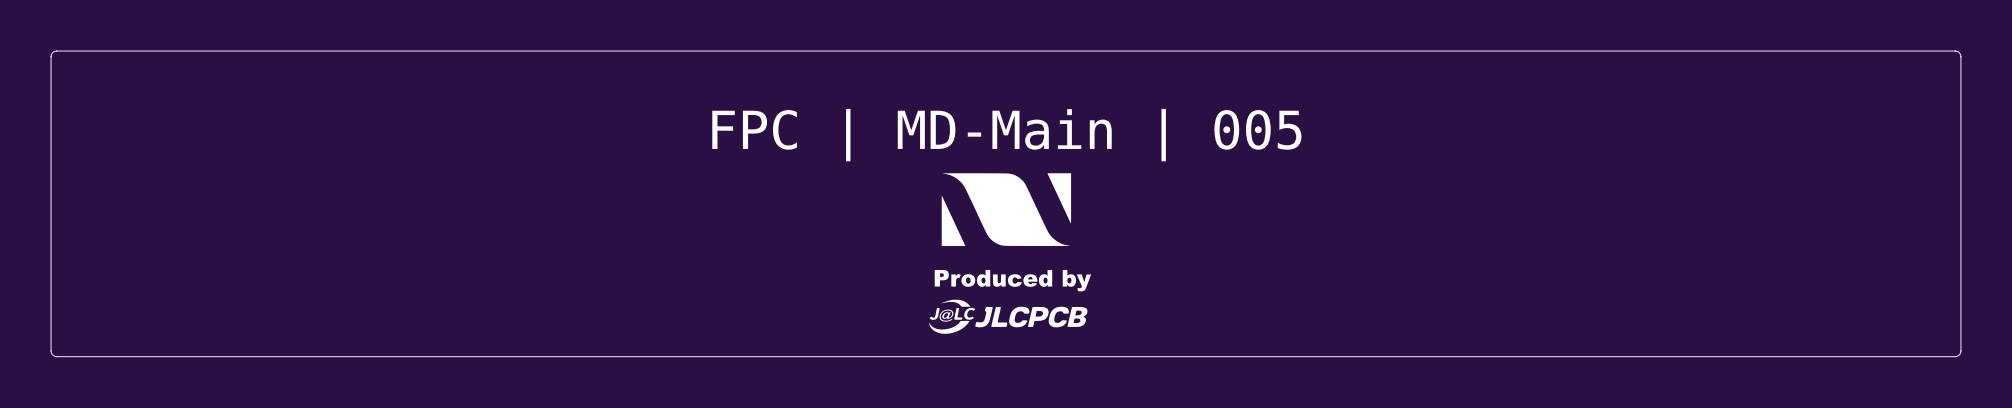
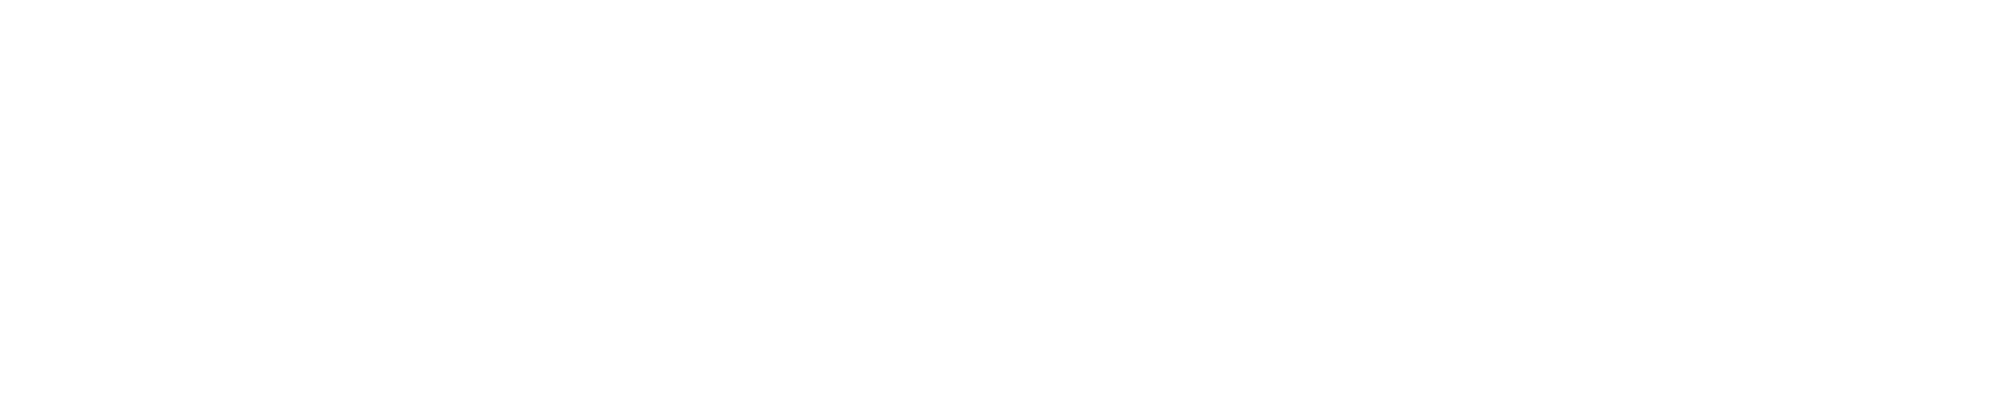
board edge: (1955, 51) (56, 51) (51, 56) (51, 351) (56, 356) (1955, 356) (1960, 350) (1960, 56) (1959, 52) (1955, 51) -> none
text: FPC | MD-Main | 005 (1006, 135) -> none
drawing: [941, 173, 1072, 247] -> none
drawing: [929, 269, 1092, 334] -> none

